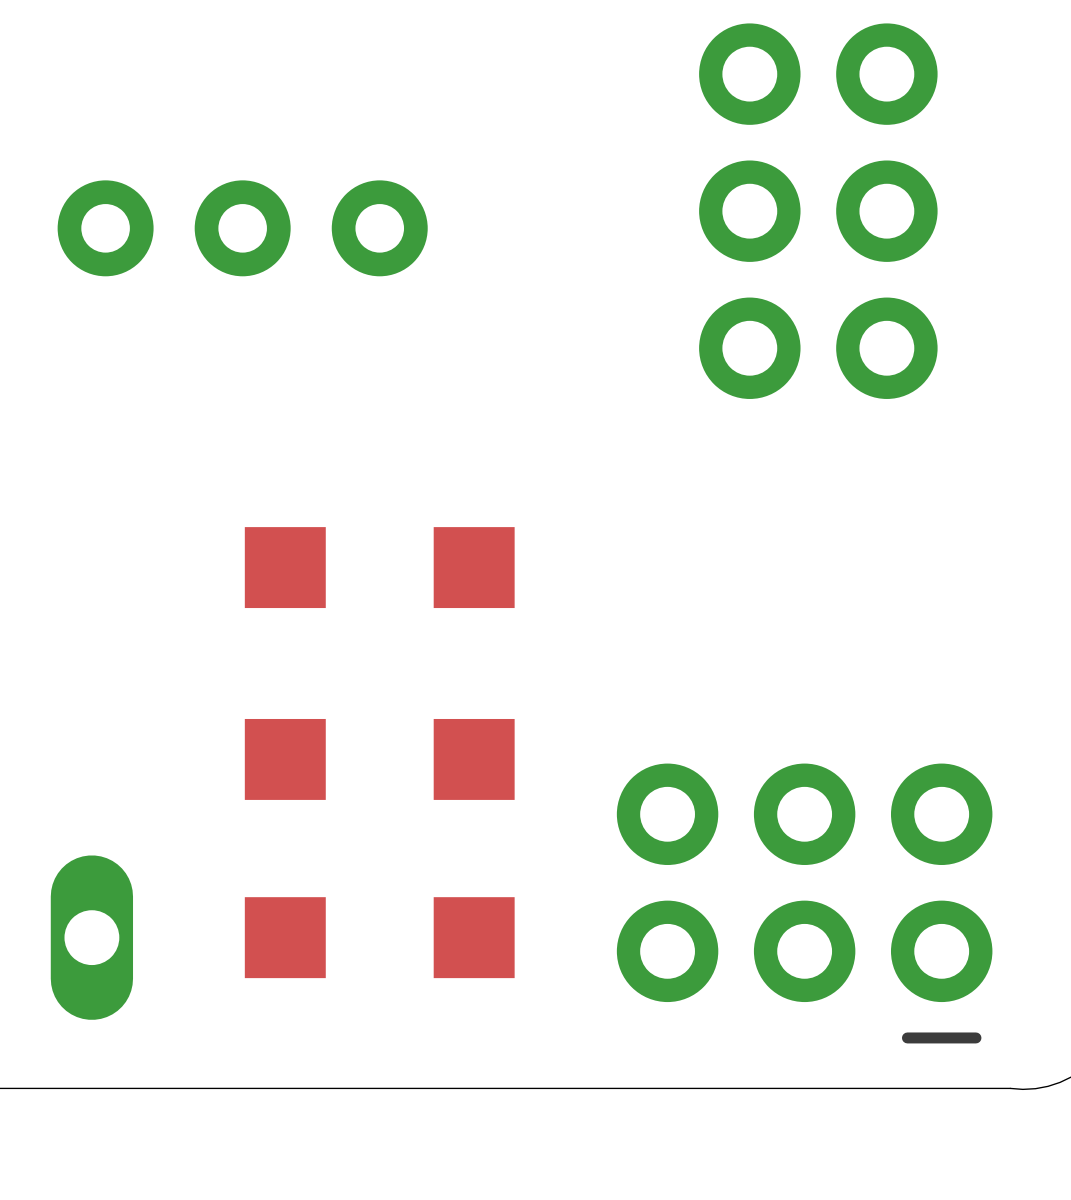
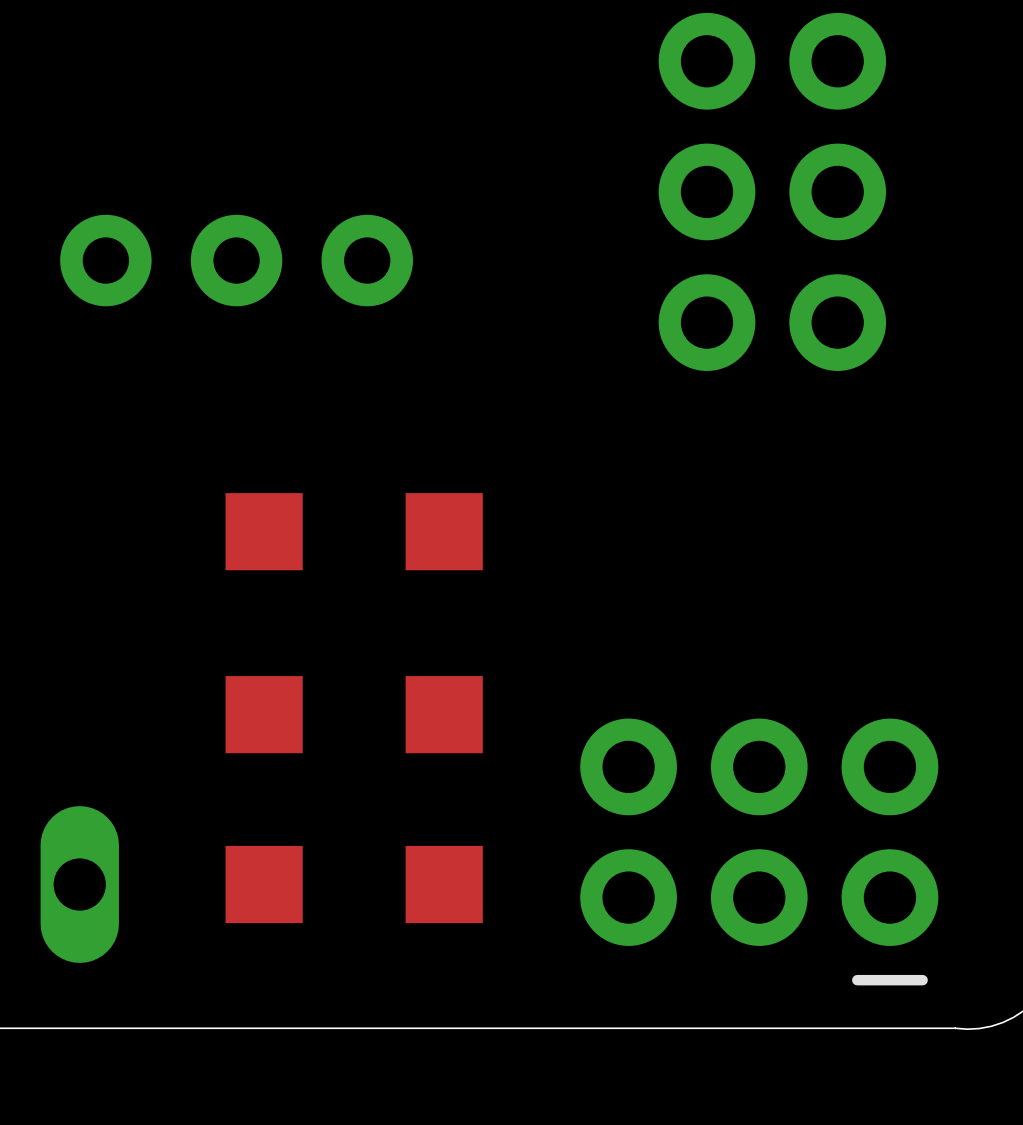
part position: (242, 228) -> (236, 260)

